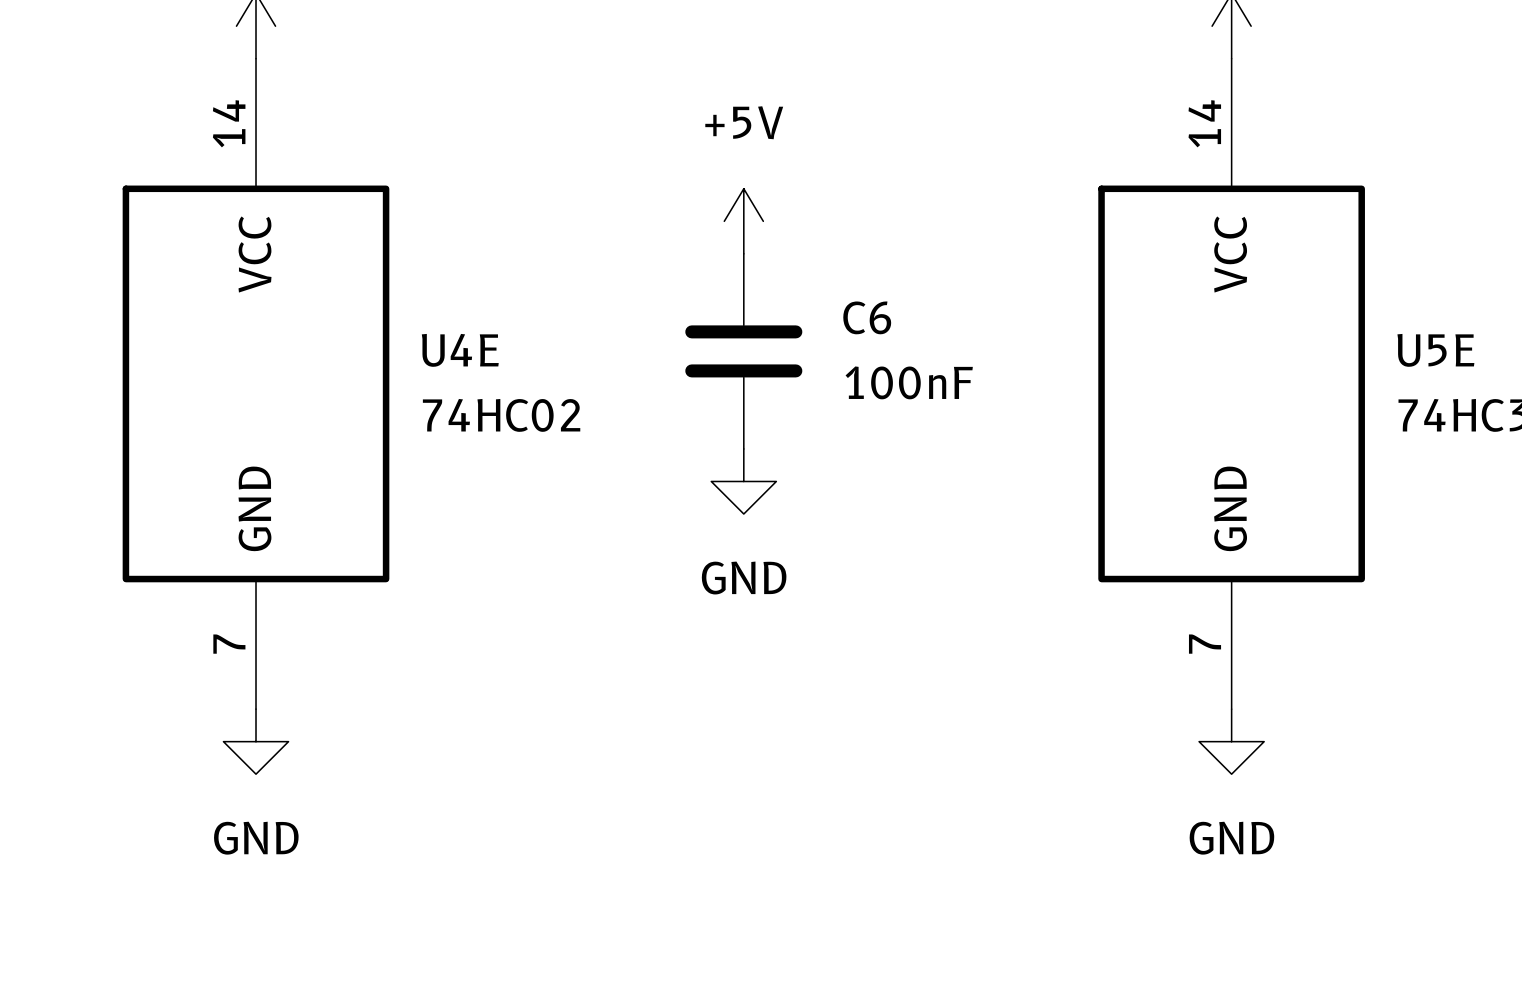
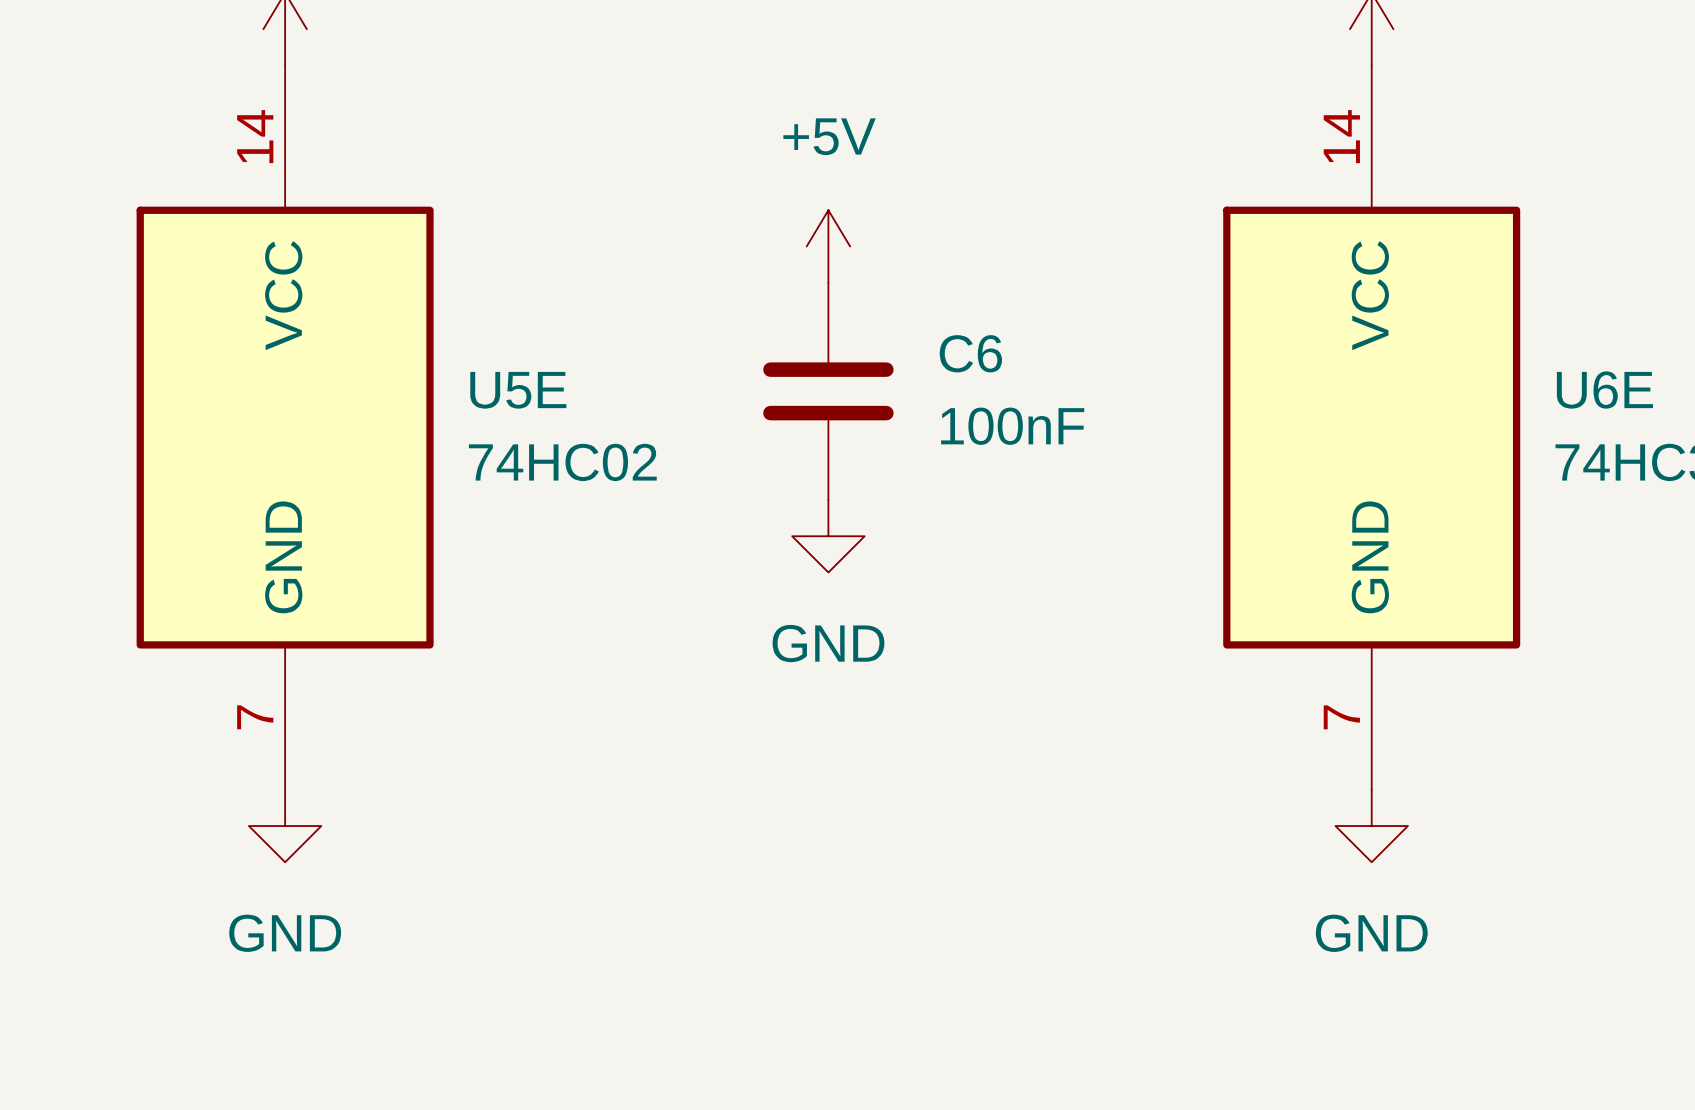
U4E name: U4E (460, 350) -> U5E (518, 390)
U5E name: U5E (1435, 350) -> U6E (1604, 390)

